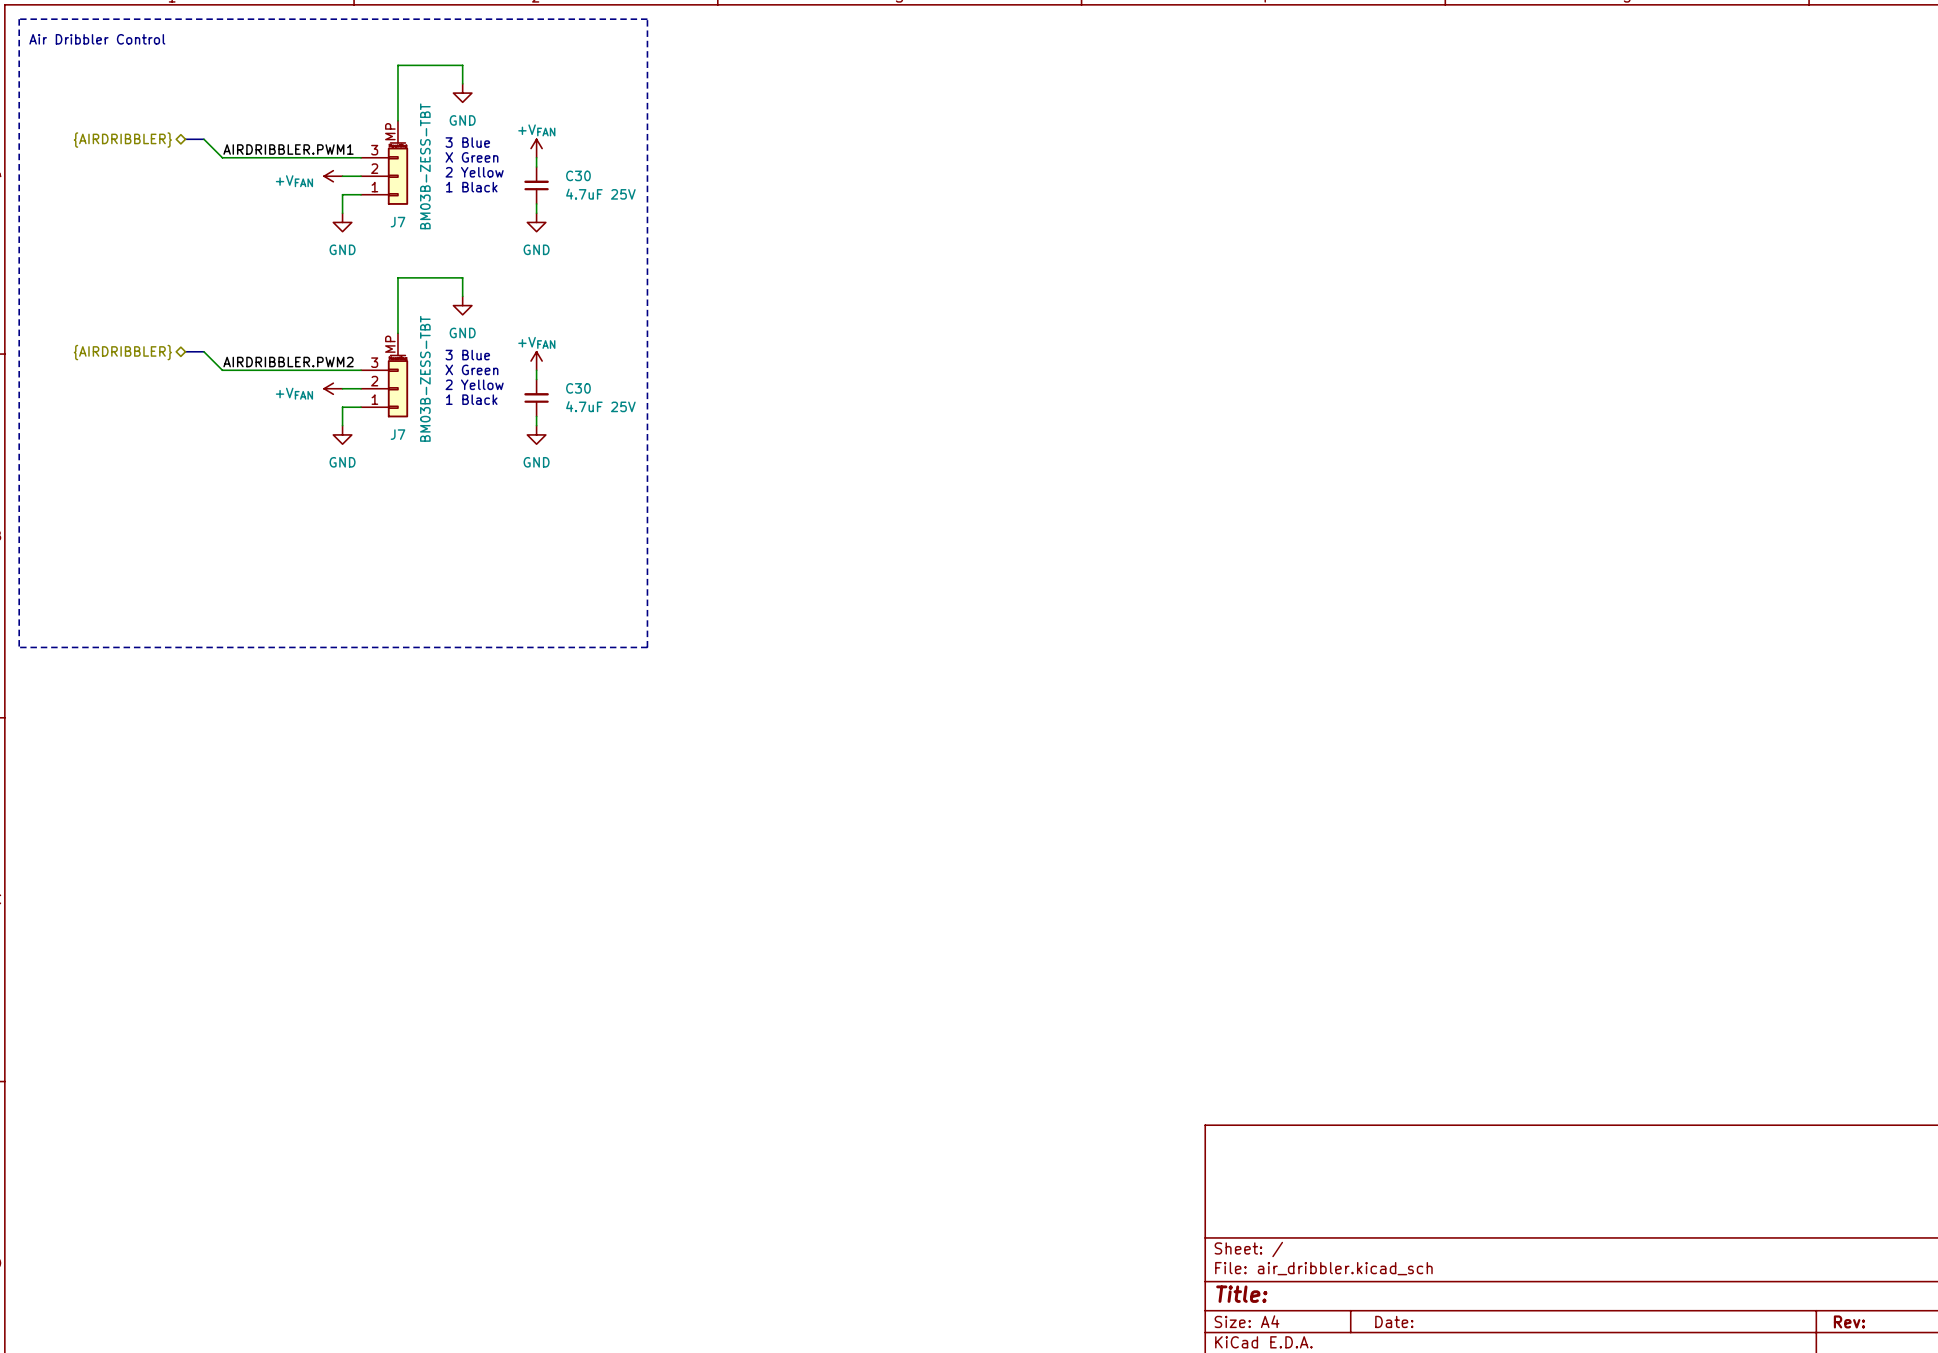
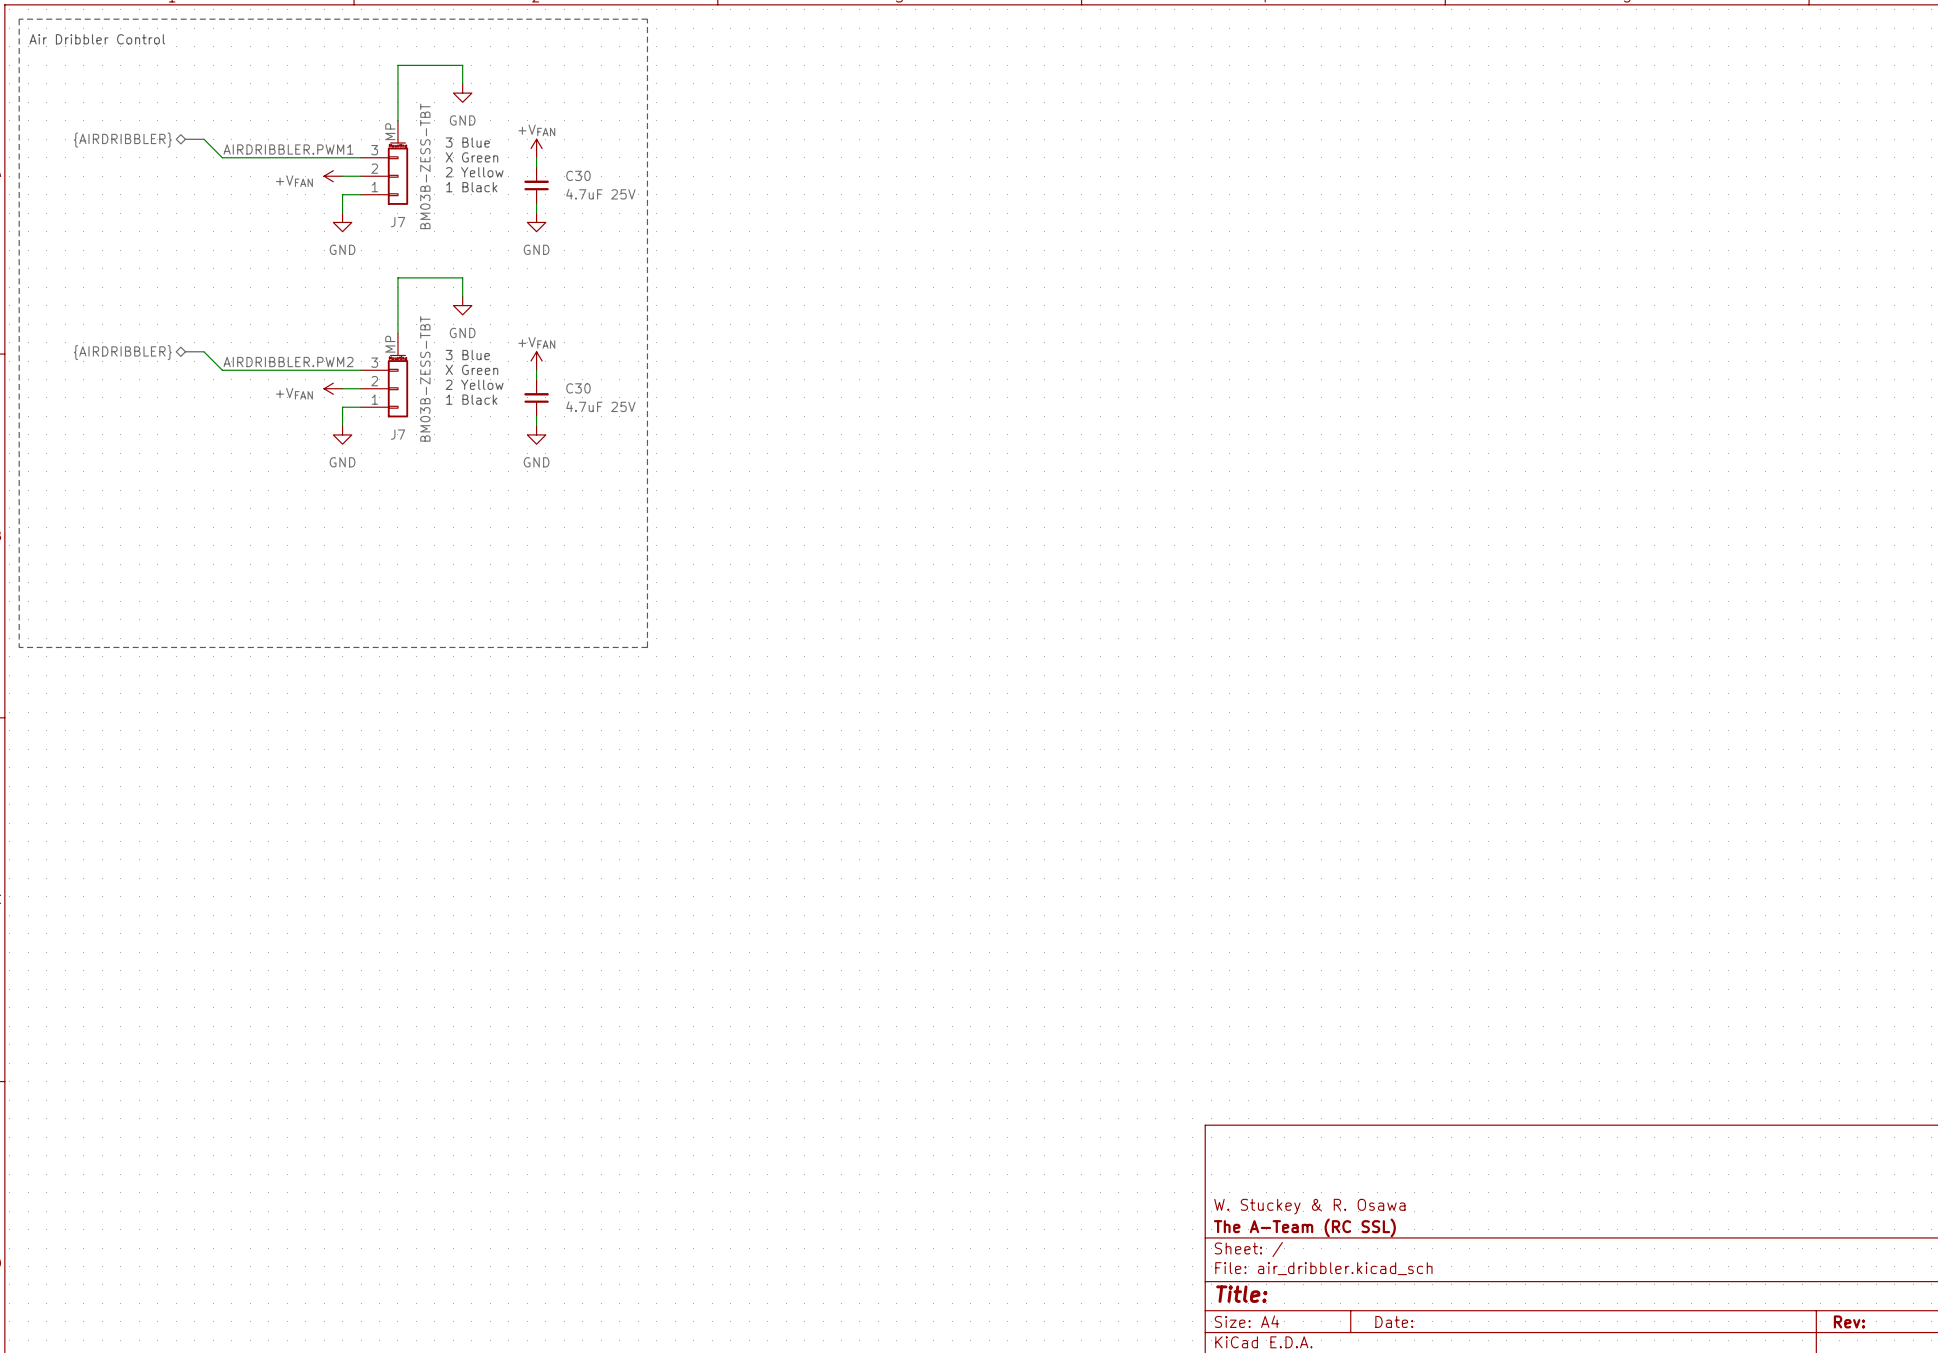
title block: none -> W. Stuckey & R. Osawa (1309, 1206)
title block: none -> The A-Team (RC SSL) (1304, 1227)

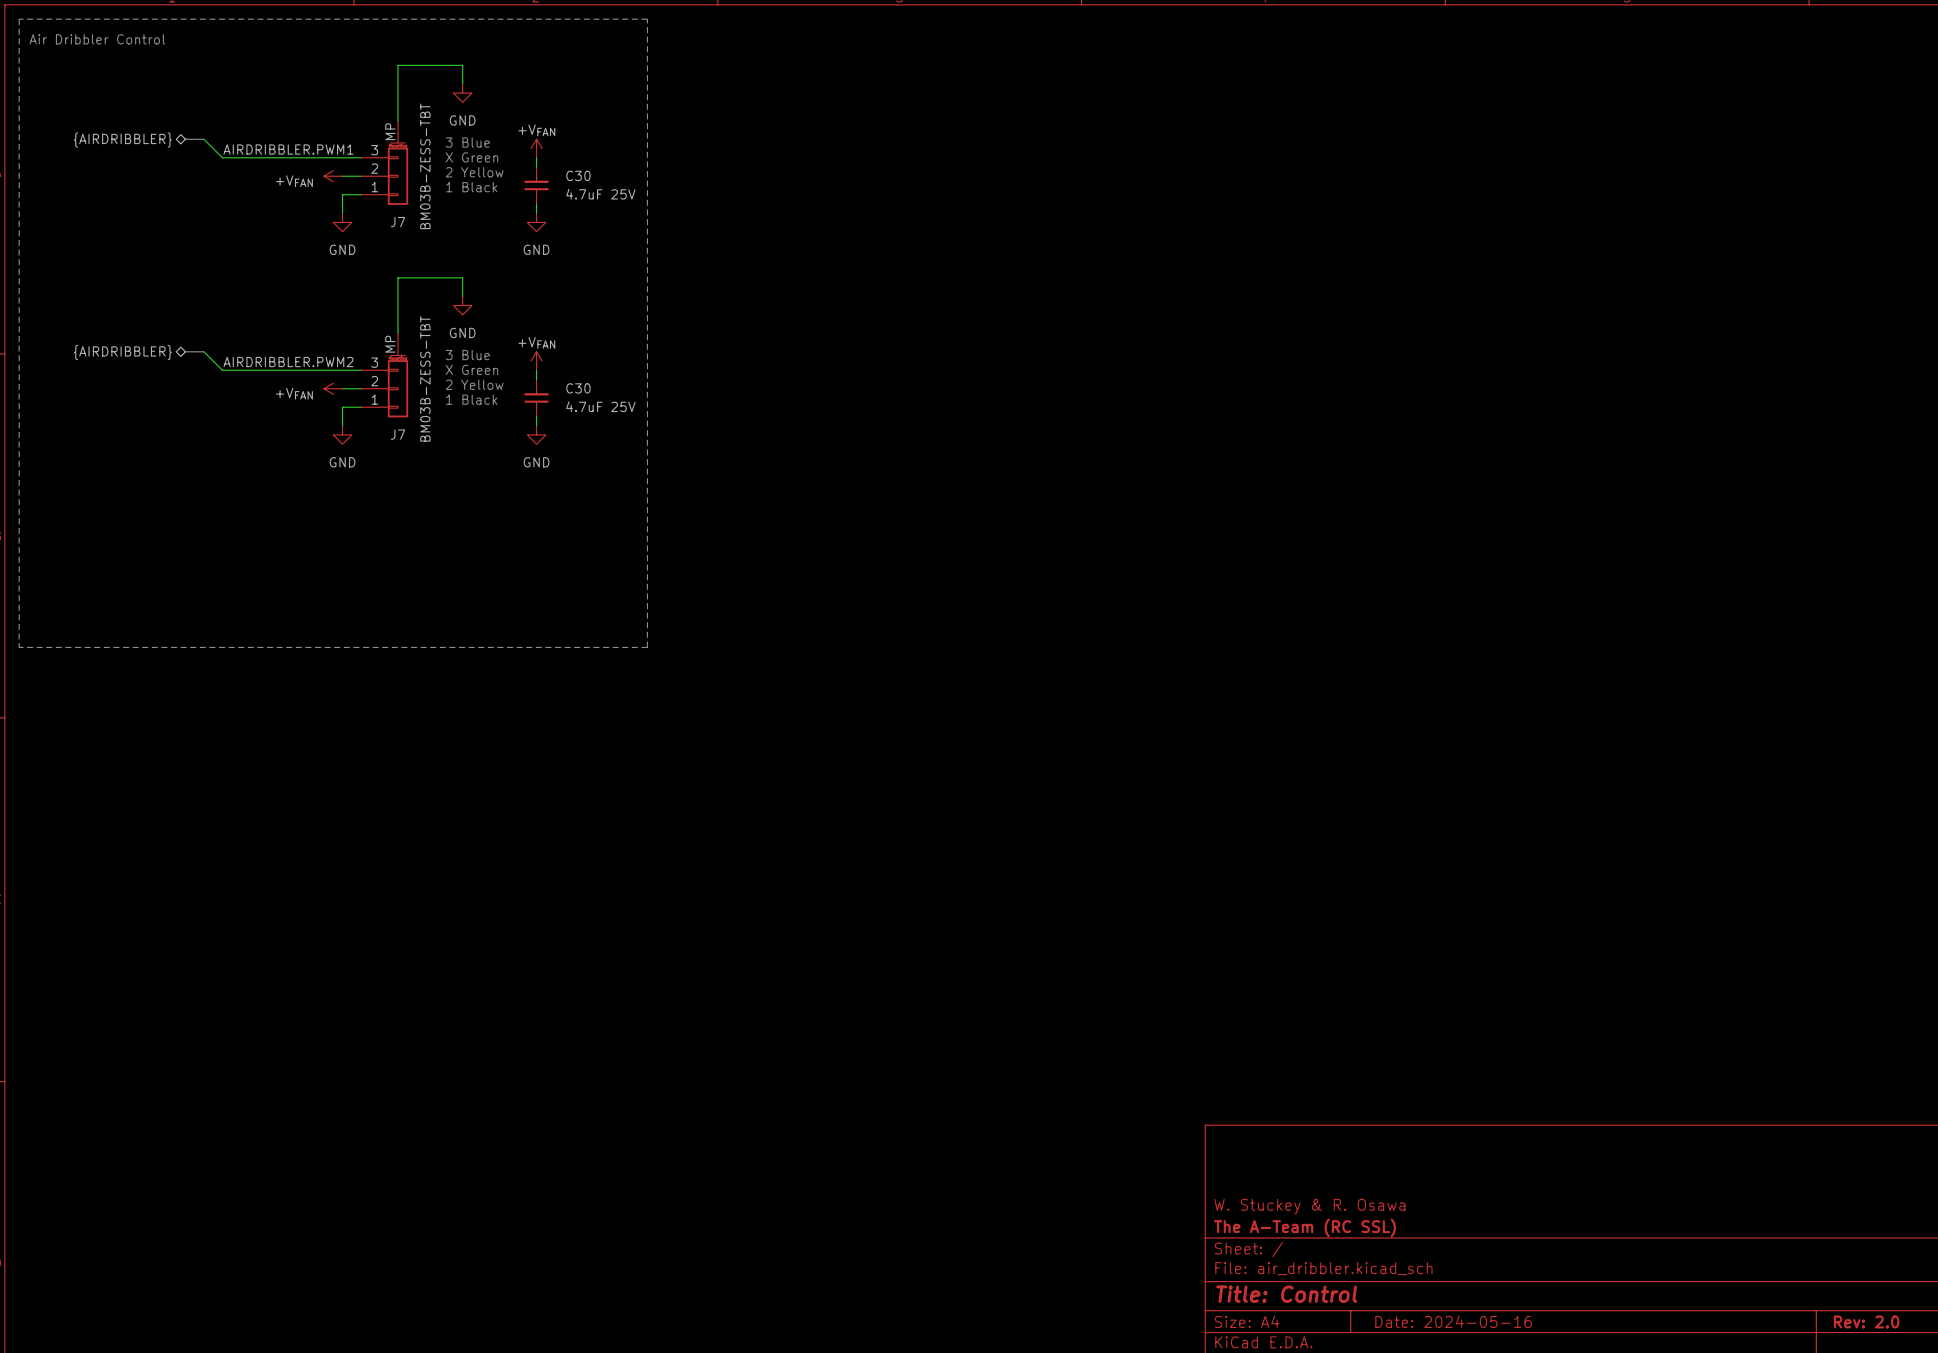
title block: Title: (1241, 1294) -> Title: Control (1286, 1294)
title block: Date: (1394, 1321) -> Date: 2024-05-16 (1453, 1321)
title block: Rev: (1849, 1321) -> Rev: 2.0 (1866, 1321)

